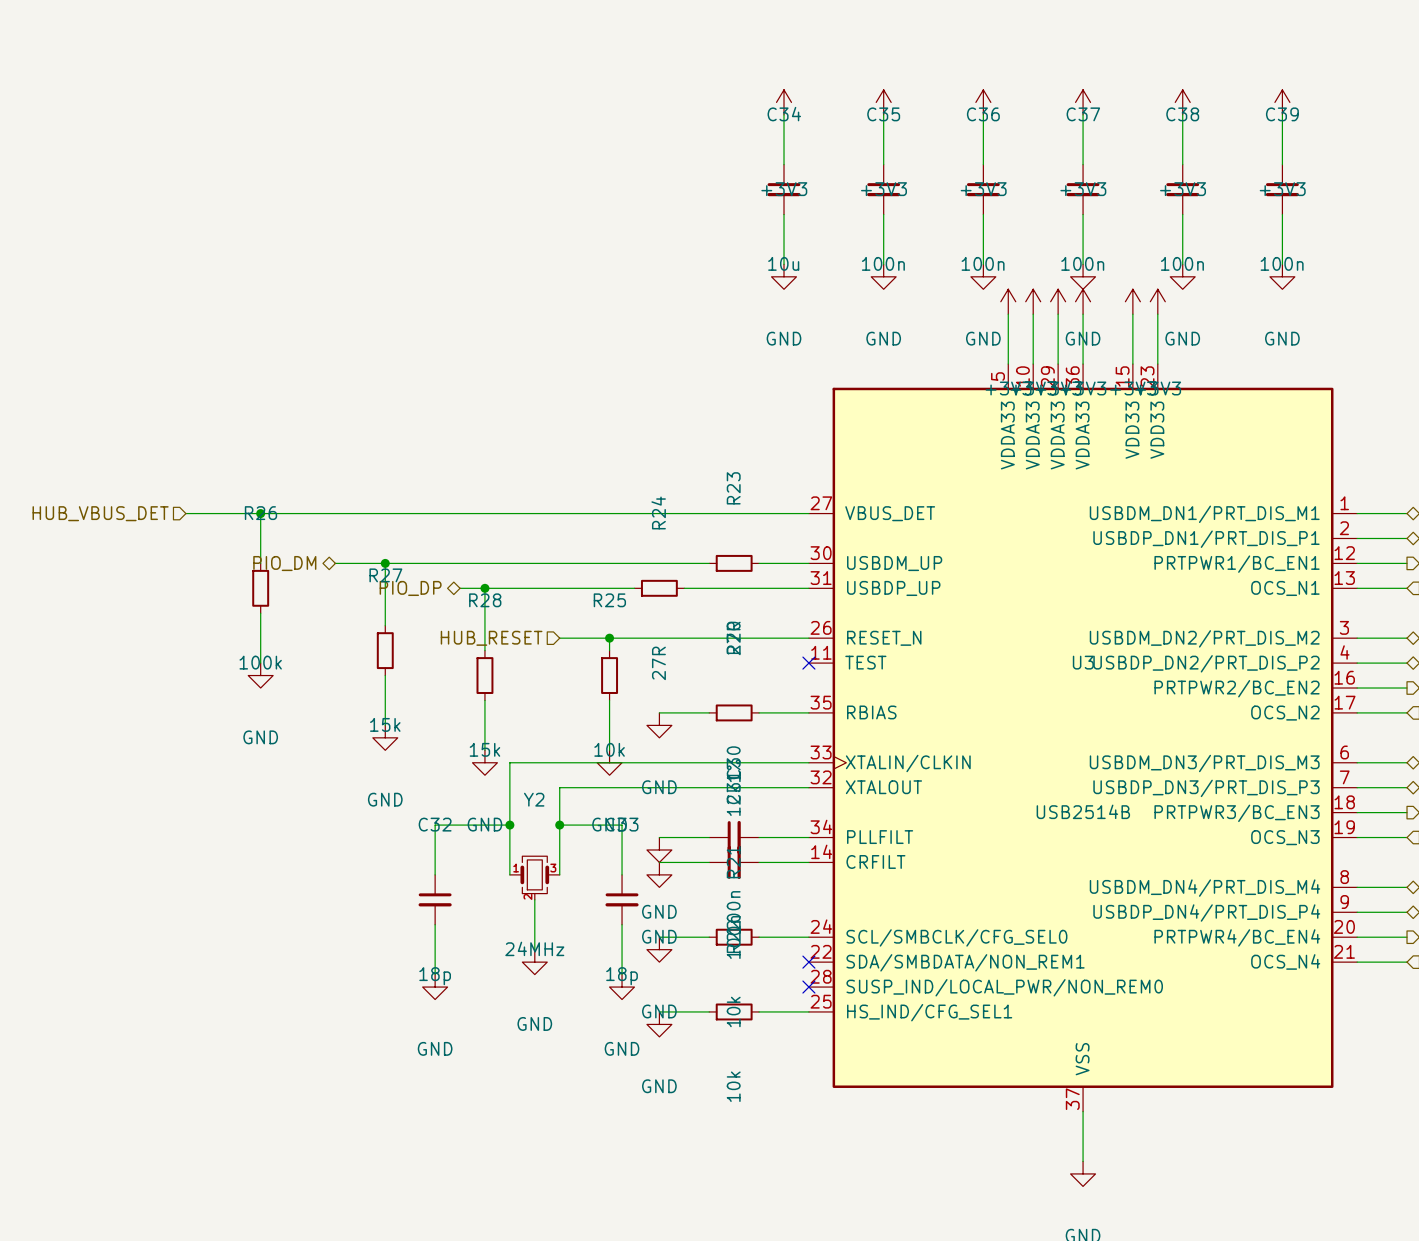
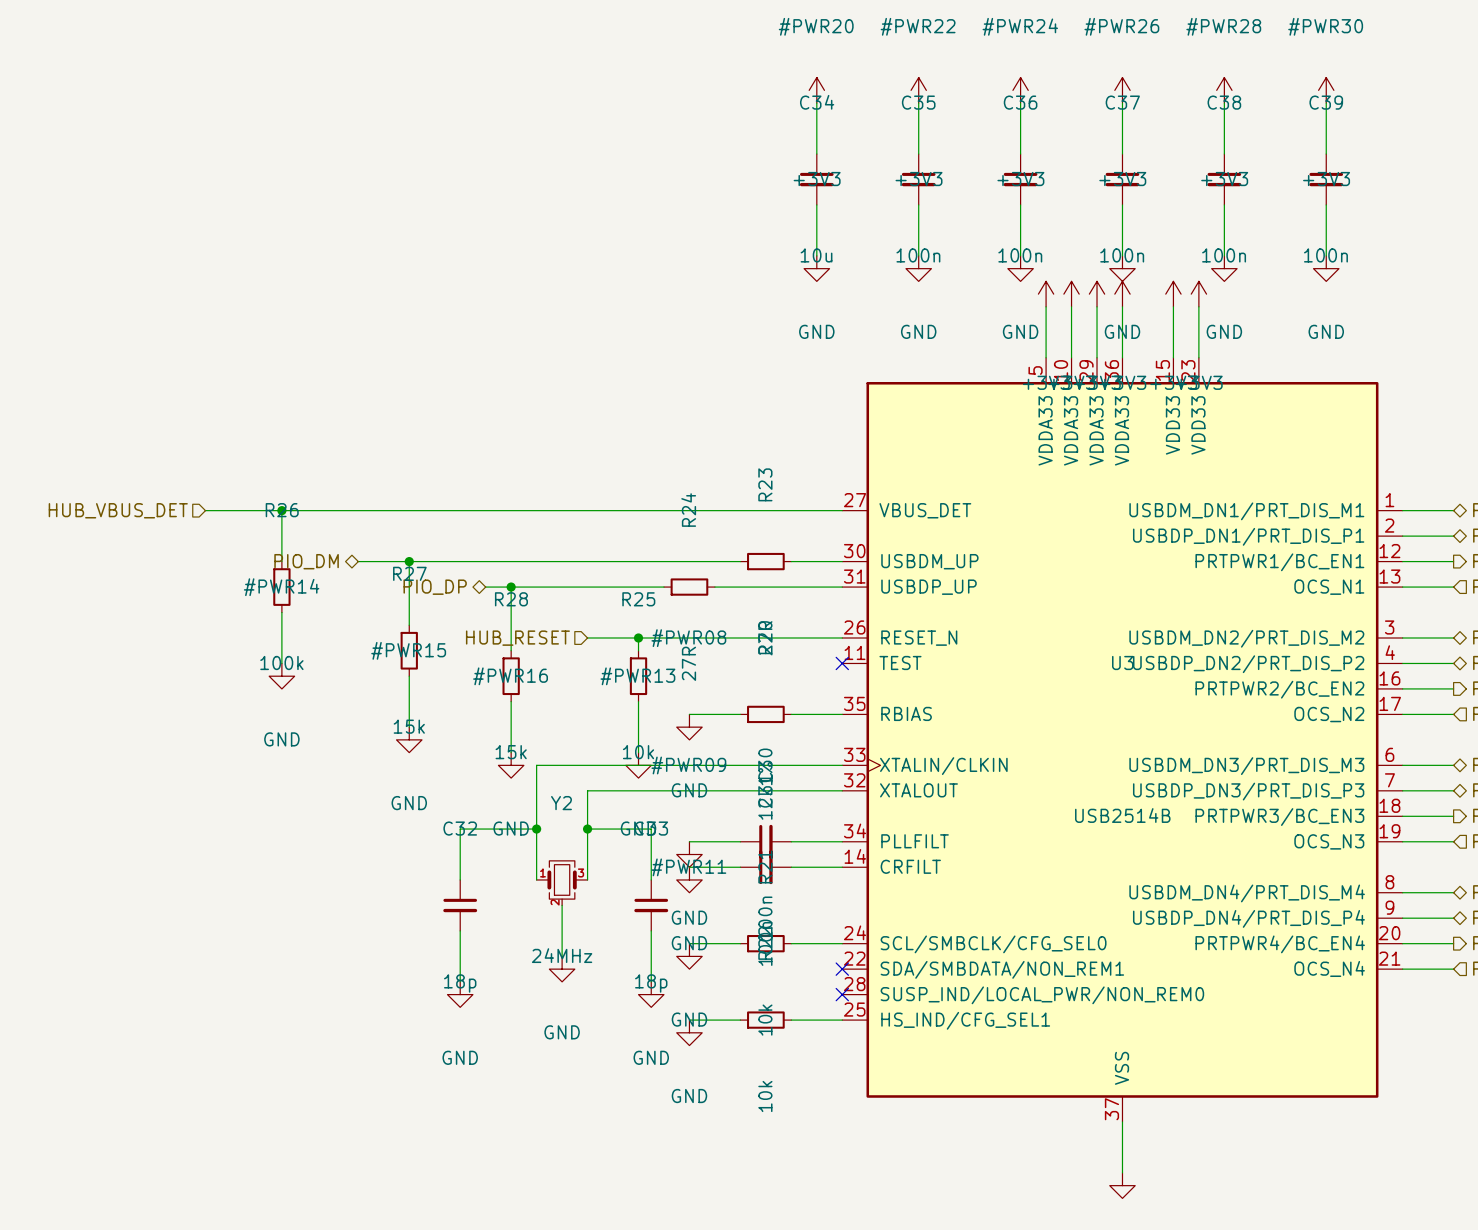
#PWR20 name: none -> #PWR20 (816, 26)
#PWR22 name: none -> #PWR22 (918, 26)
#PWR24 name: none -> #PWR24 (1020, 26)
#PWR26 name: none -> #PWR26 (1121, 26)
#PWR28 name: none -> #PWR28 (1223, 26)
#PWR30 name: none -> #PWR30 (1325, 26)
#PWR14 name: none -> #PWR14 (281, 587)
#PWR08 name: none -> #PWR08 (688, 638)
#PWR15 name: none -> #PWR15 (408, 650)
#PWR16 name: none -> #PWR16 (510, 676)
#PWR13 name: none -> #PWR13 (637, 676)
#PWR09 name: none -> #PWR09 (688, 765)
#PWR11 name: none -> #PWR11 (688, 867)

